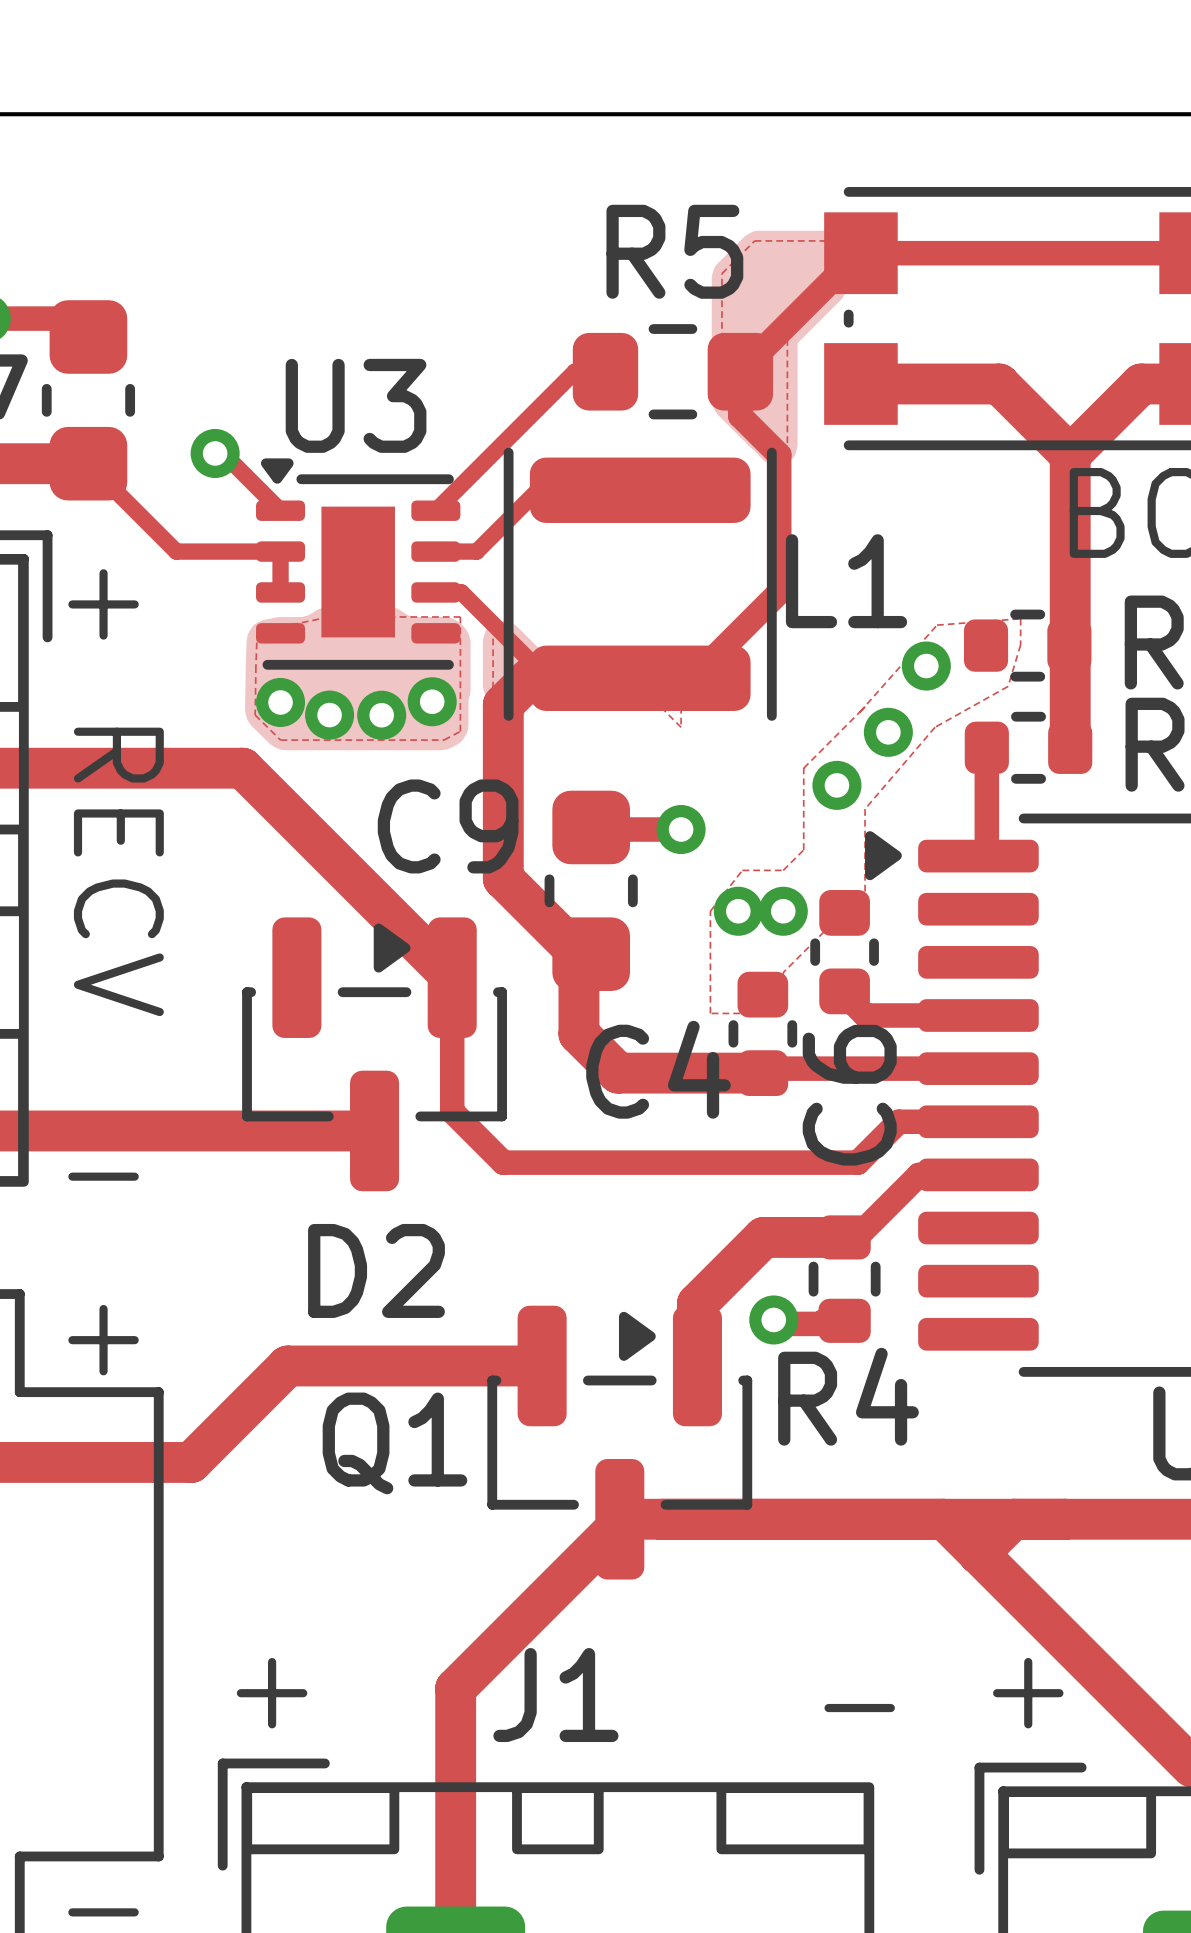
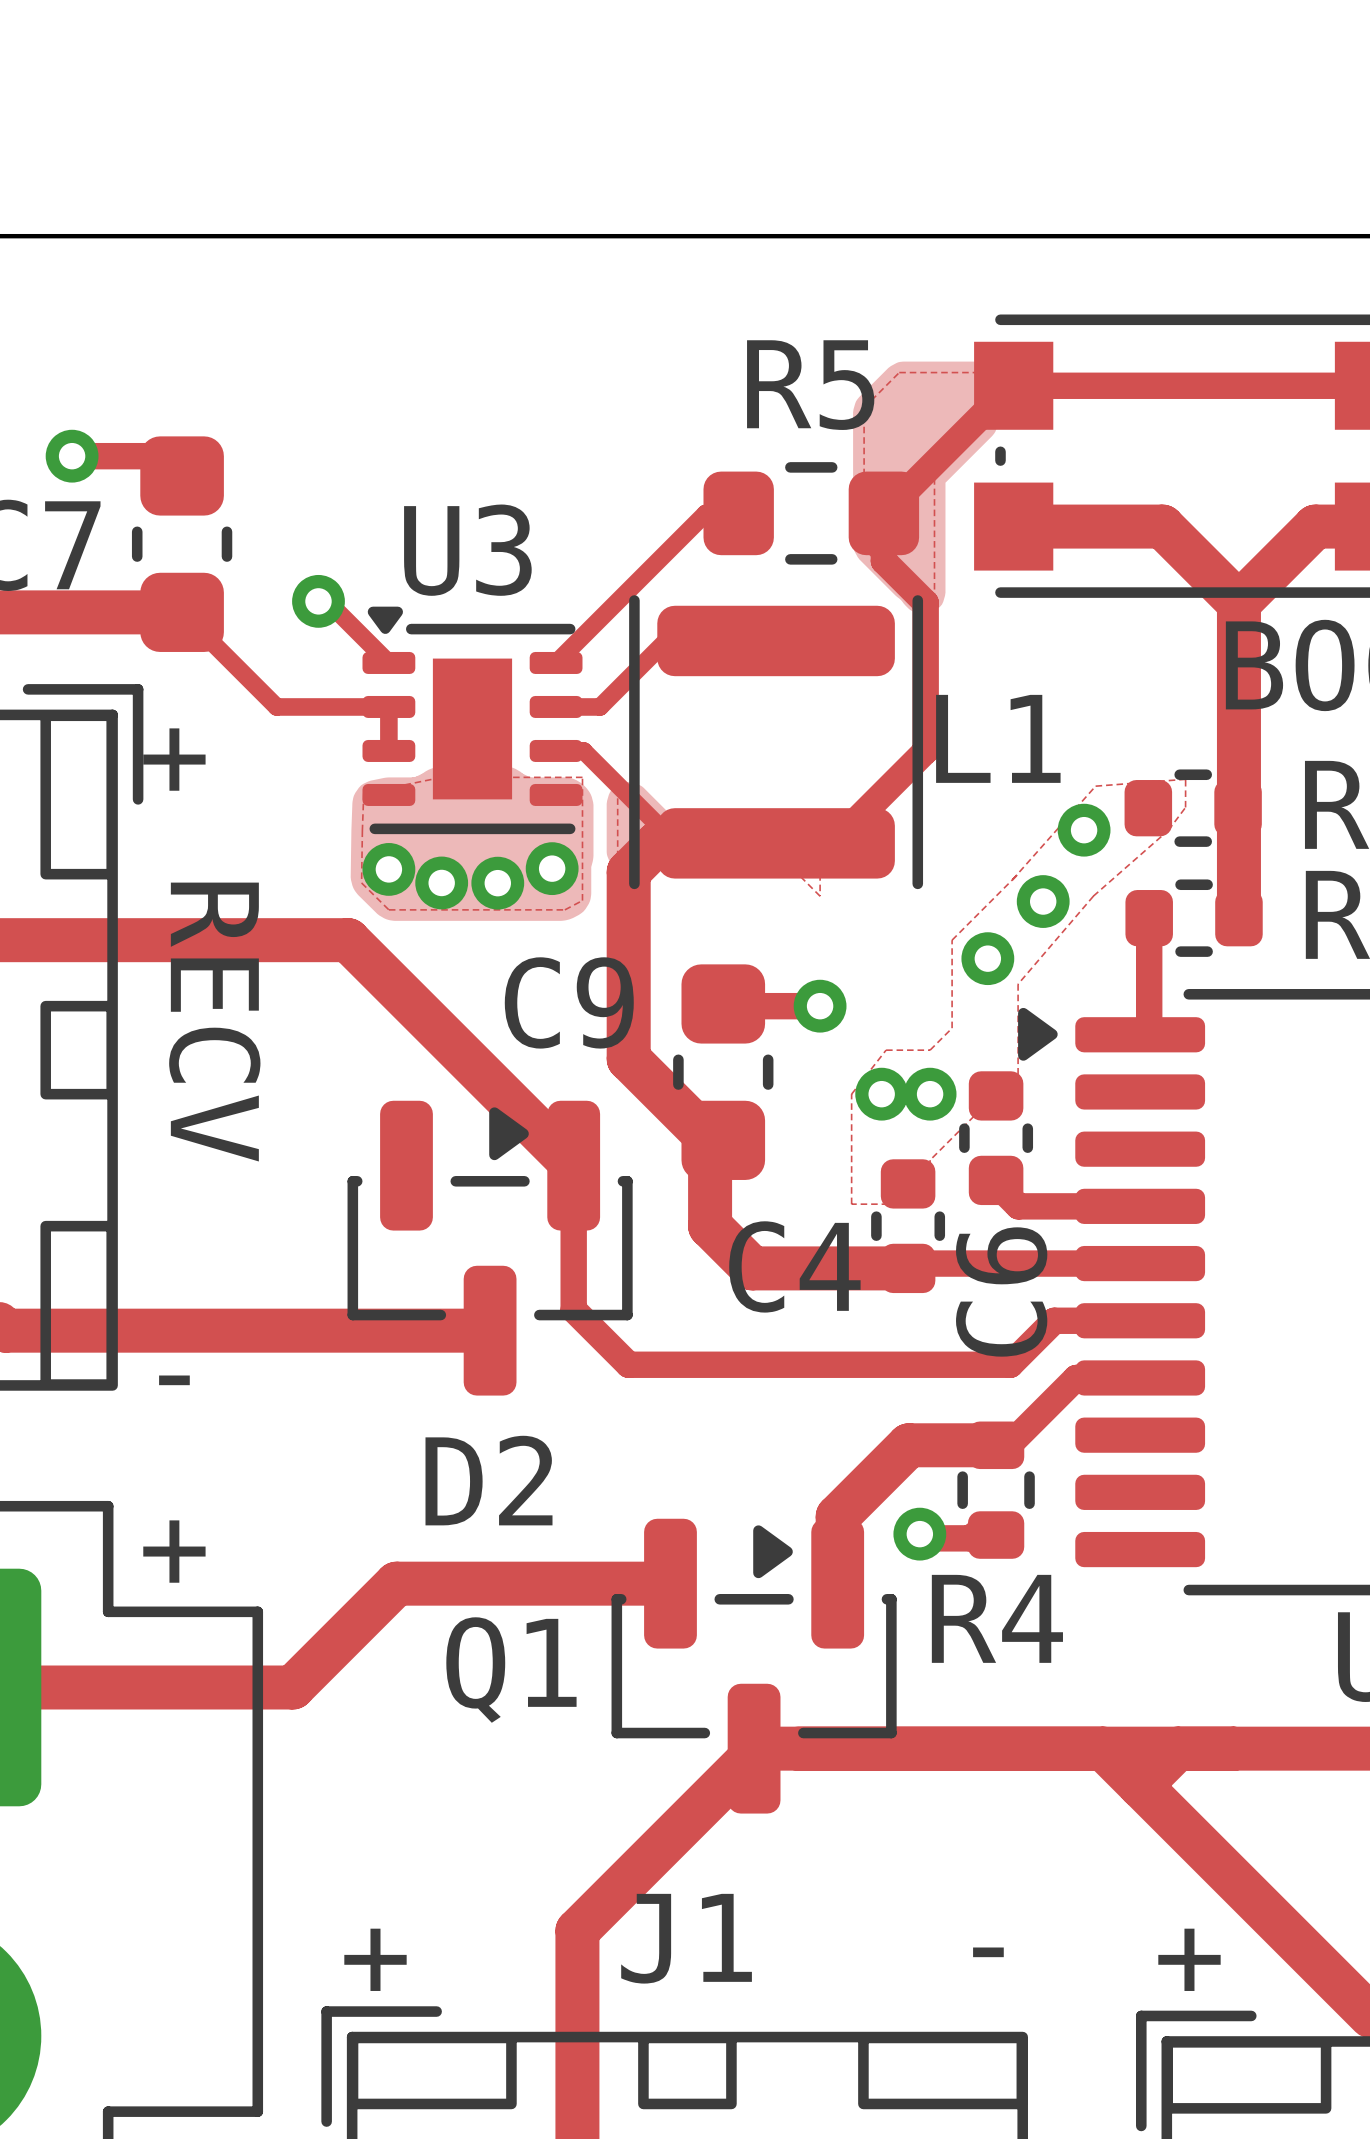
zone outline: (1020, 644) (1008, 686) (934, 727) -> (1185, 807) (1168, 830) (1093, 896)

